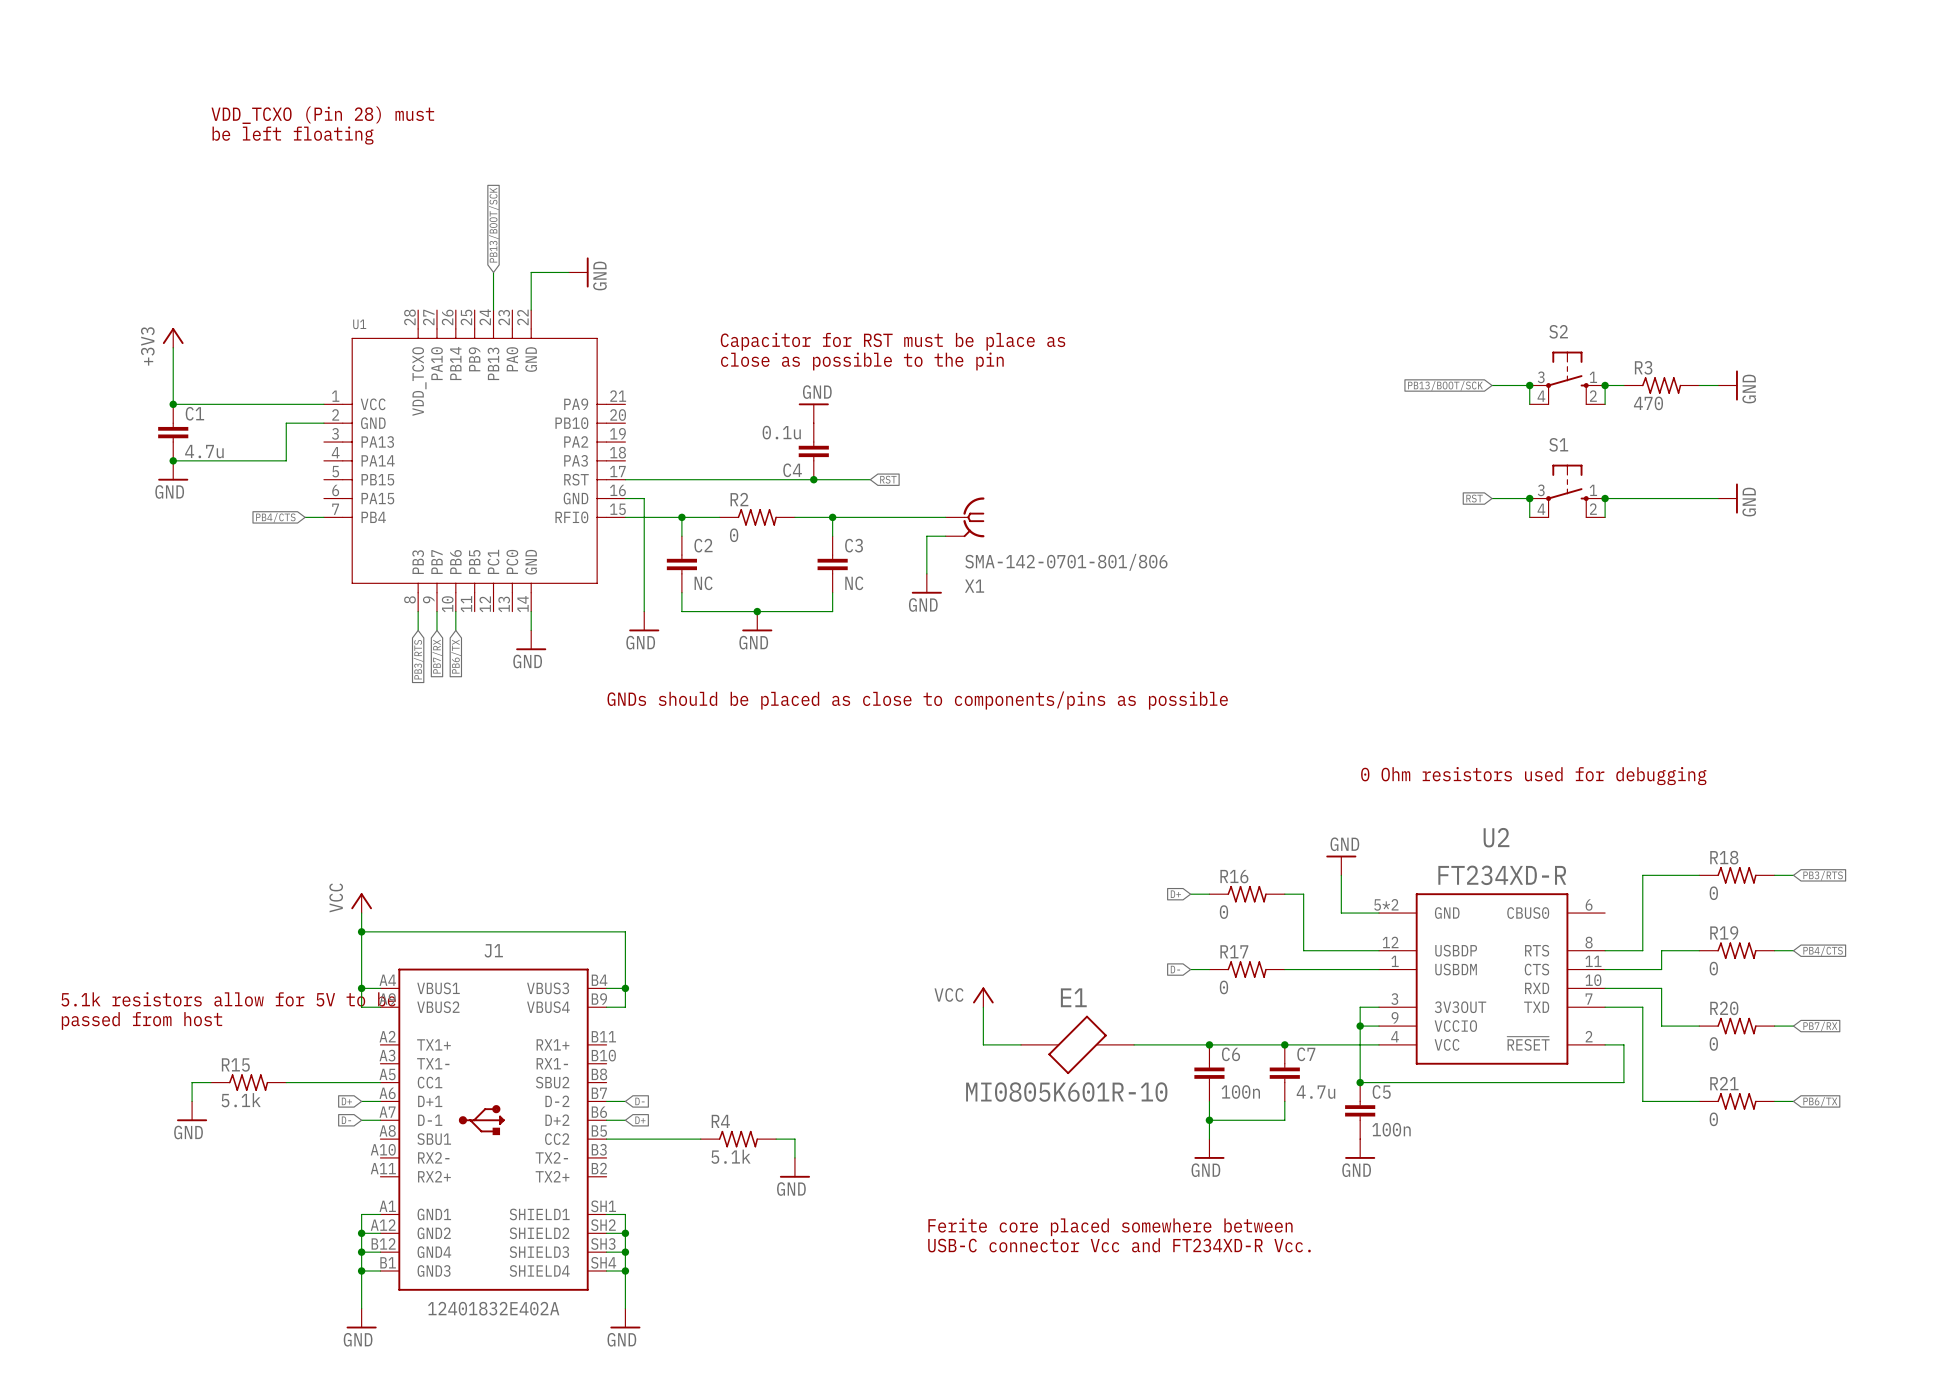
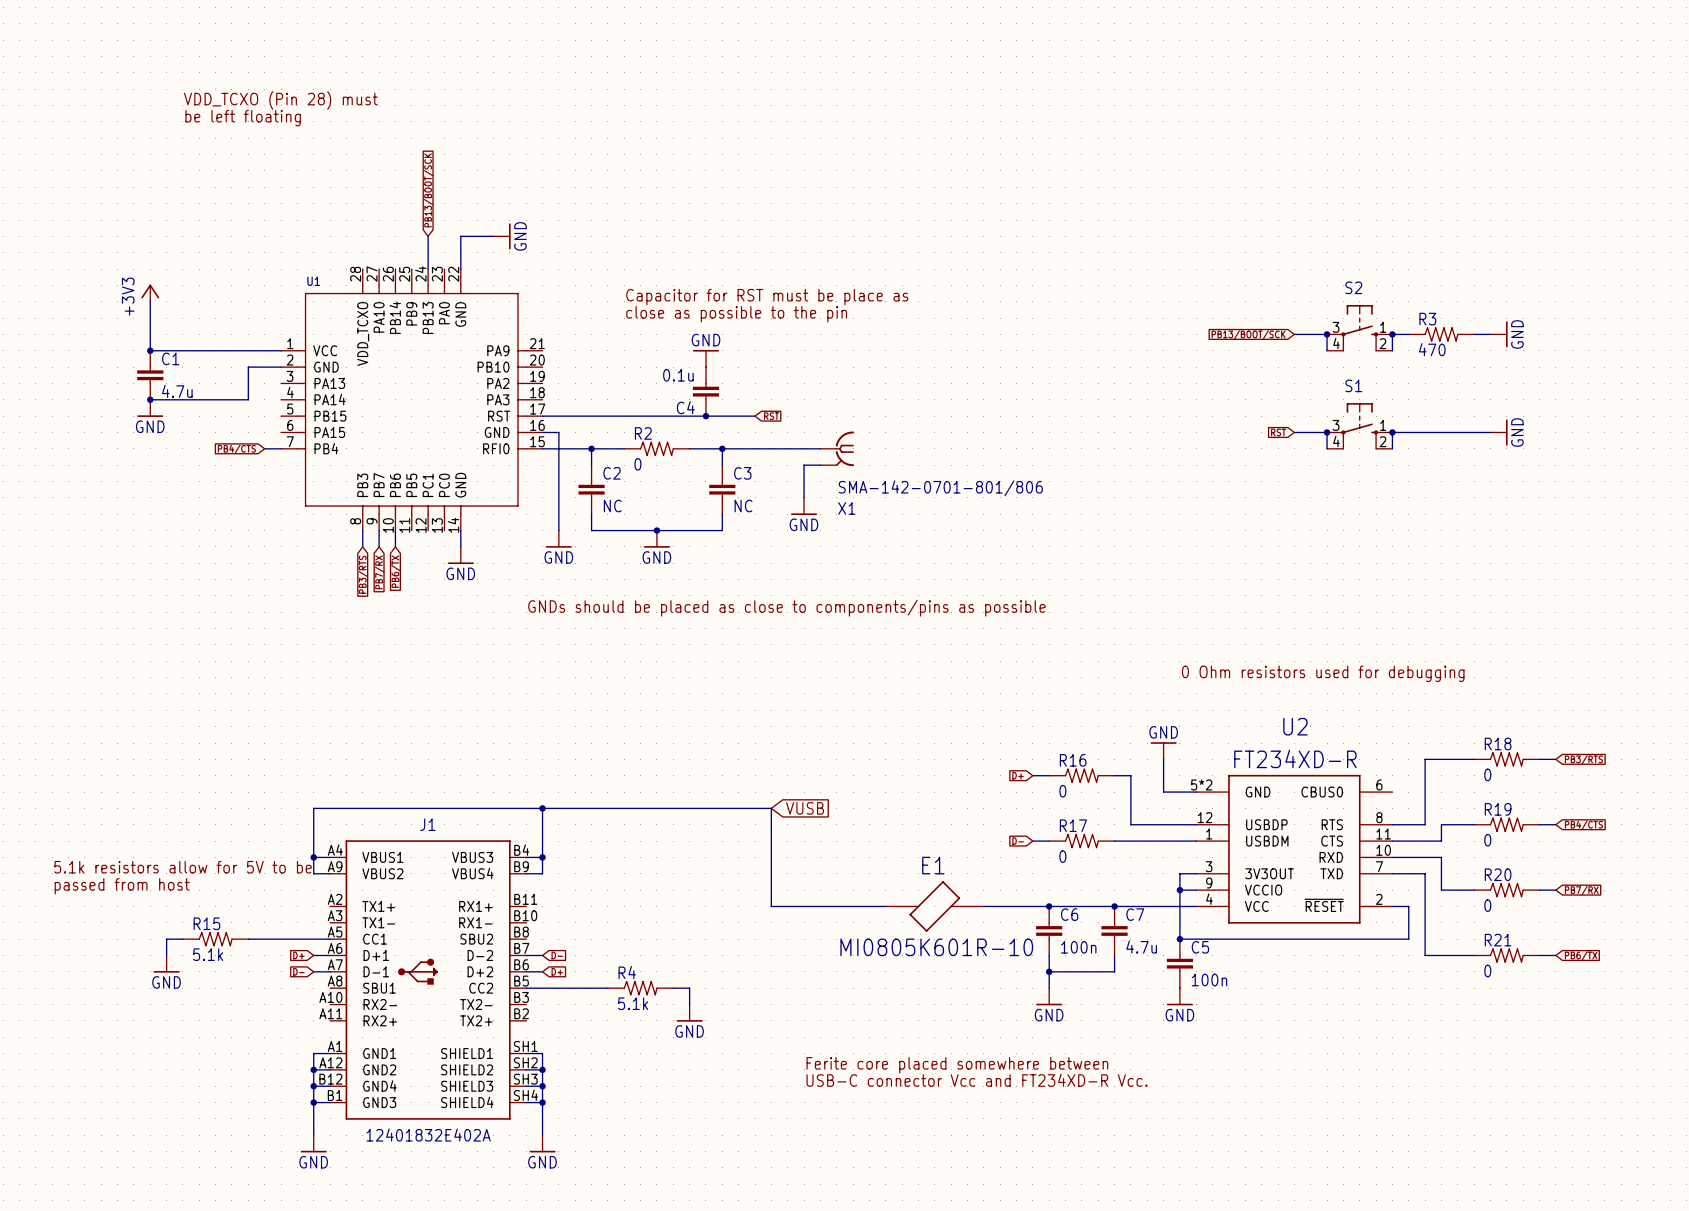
power symbol: VCC (361, 903) -> none
wire: (361, 913) (361, 931) -> none
junction: (361, 931) -> none
junction: none -> (542, 808)
global label: none -> VUSB (805, 808)
power symbol: VCC (983, 997) -> none
wire: (983, 1007) (983, 1044) -> (542, 808) (771, 808) (771, 906) (853, 906)

